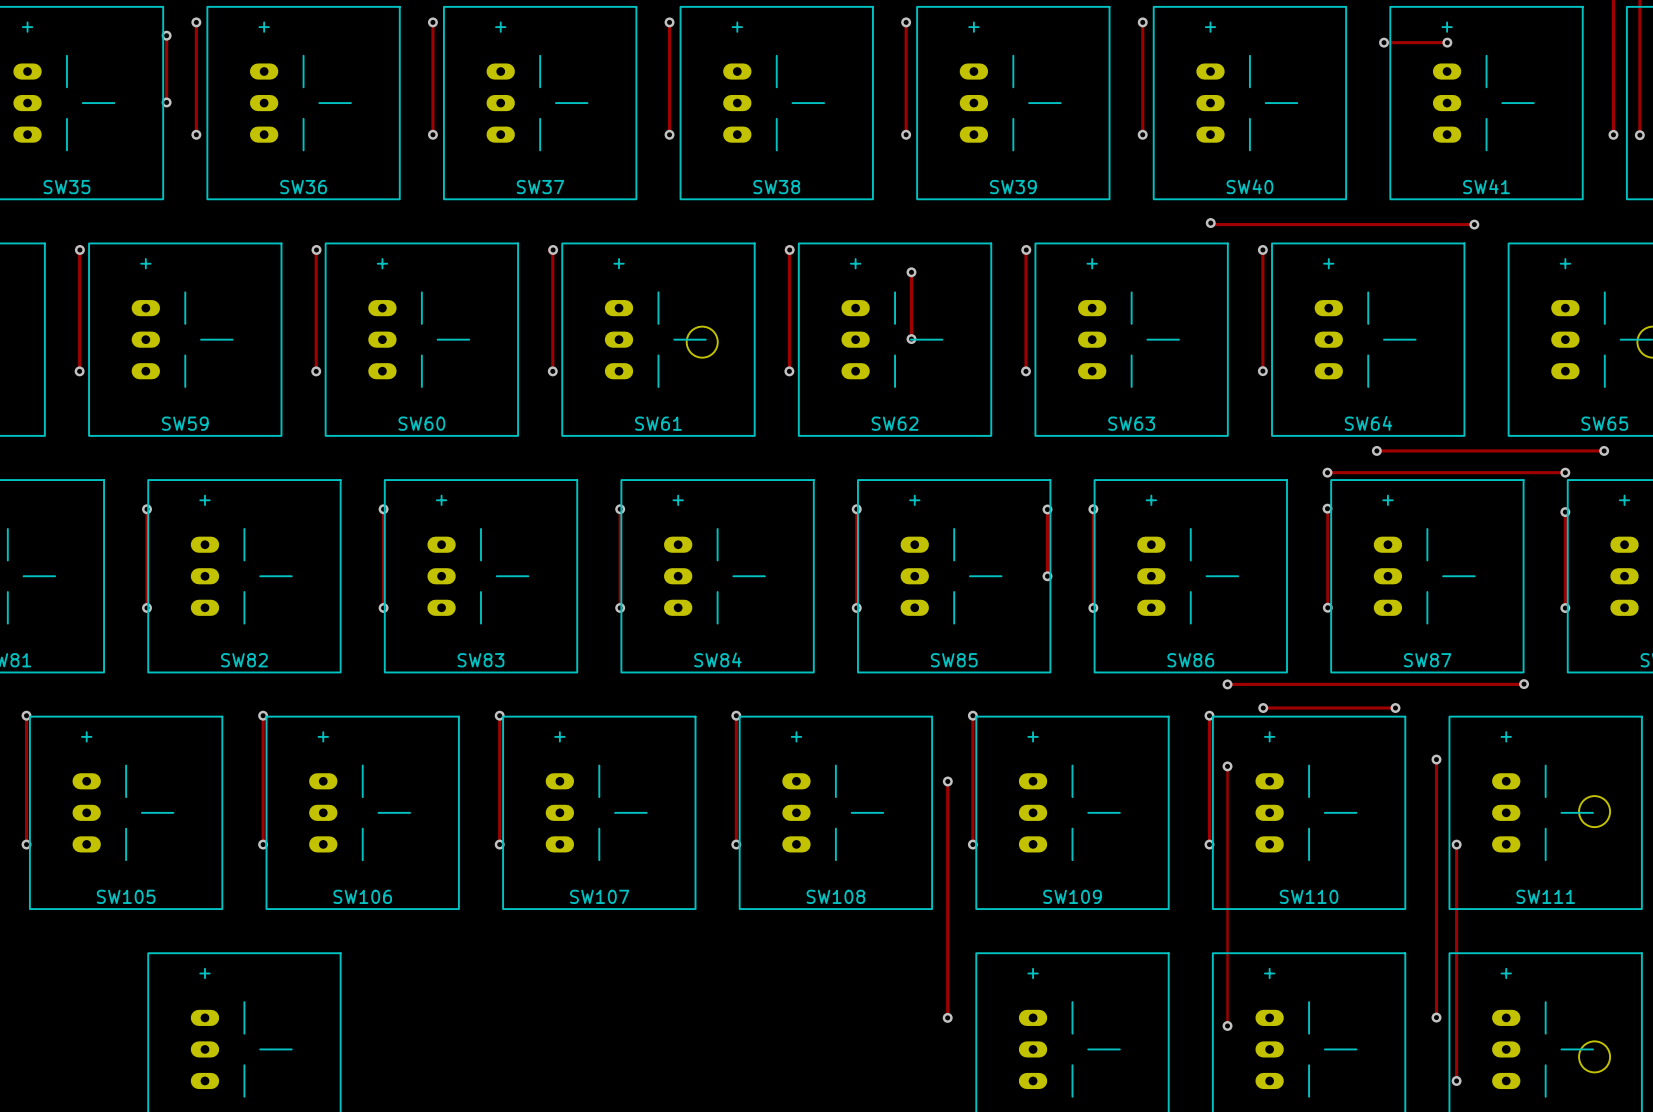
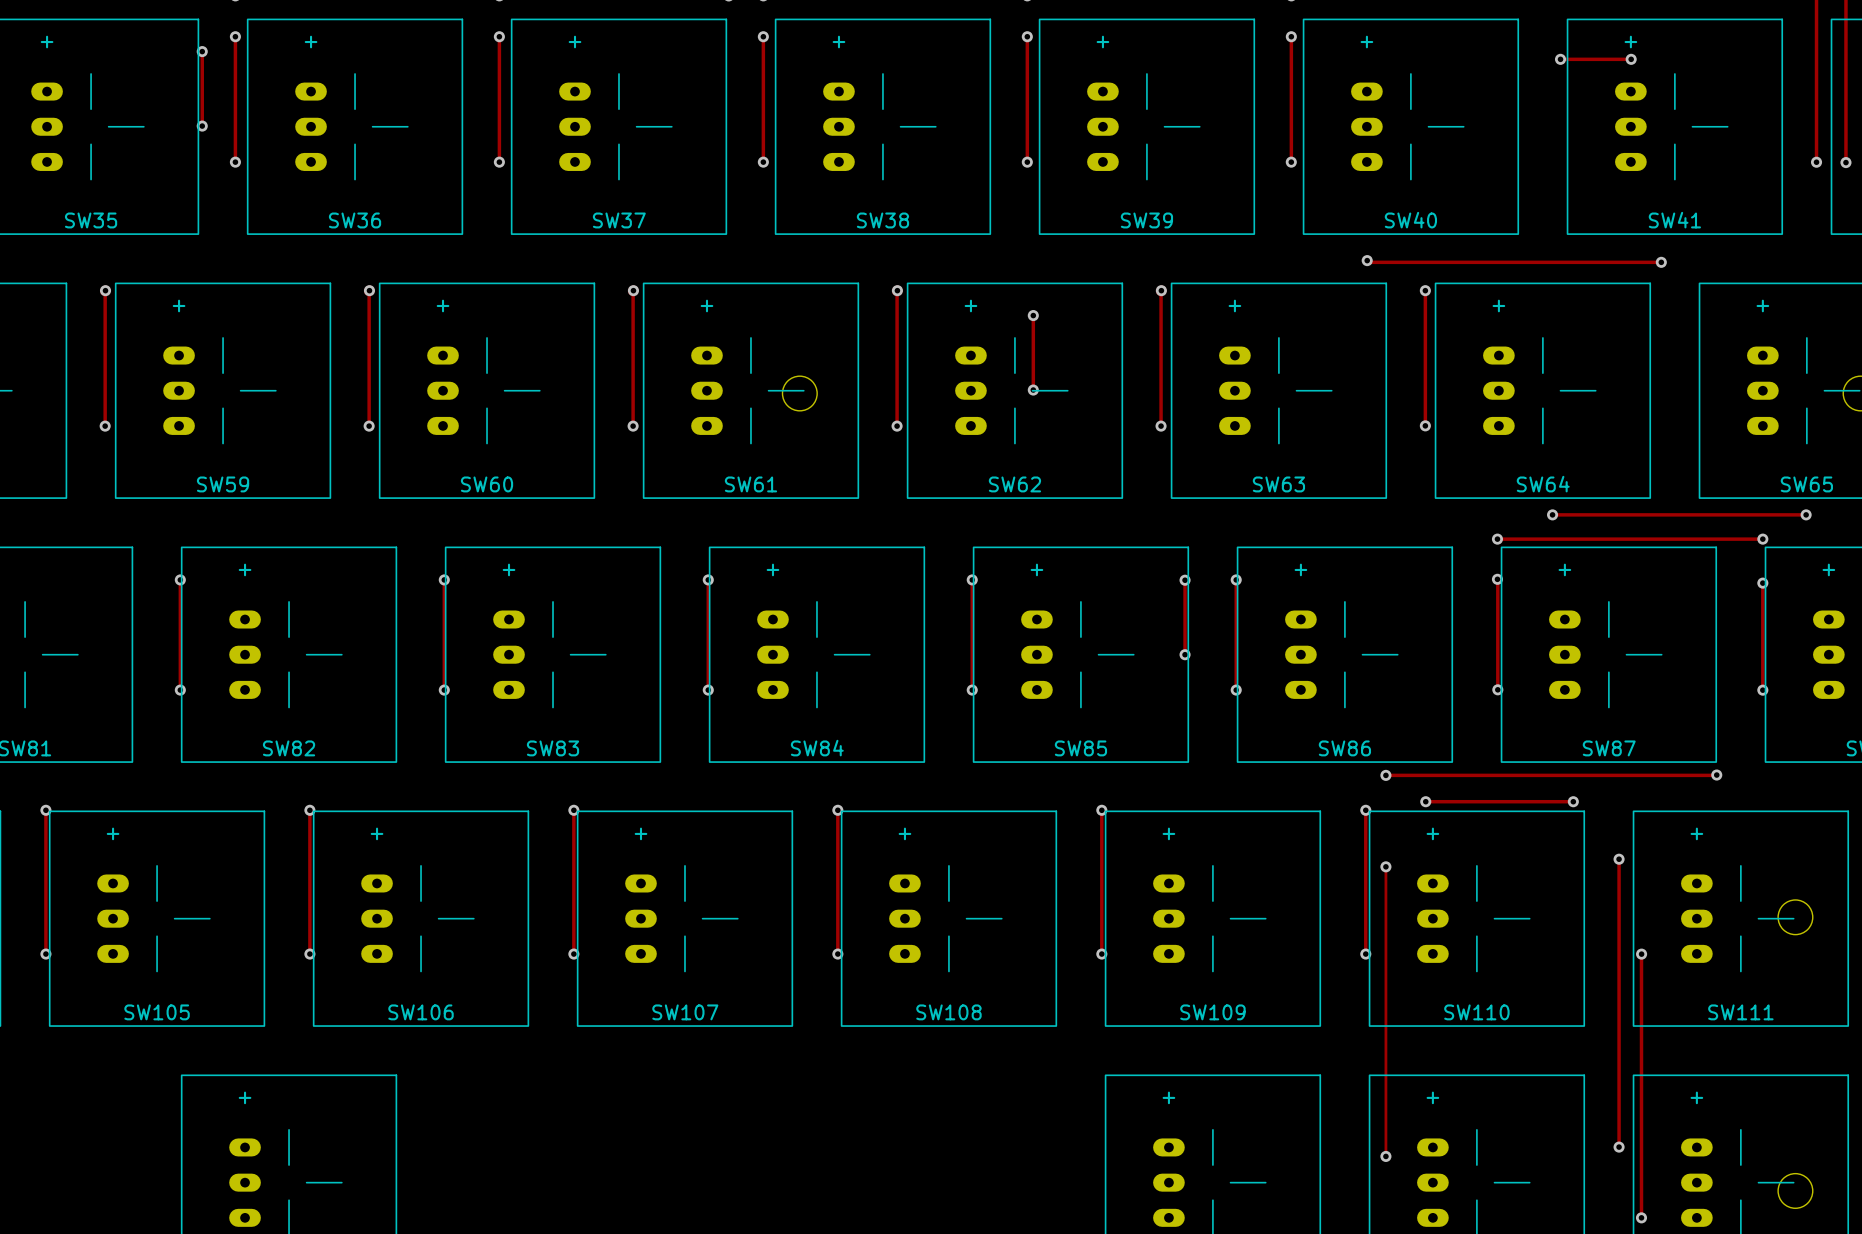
track: (947, 781) (947, 1017) -> none
via: (947, 781) -> none
via: (947, 1017) -> none

